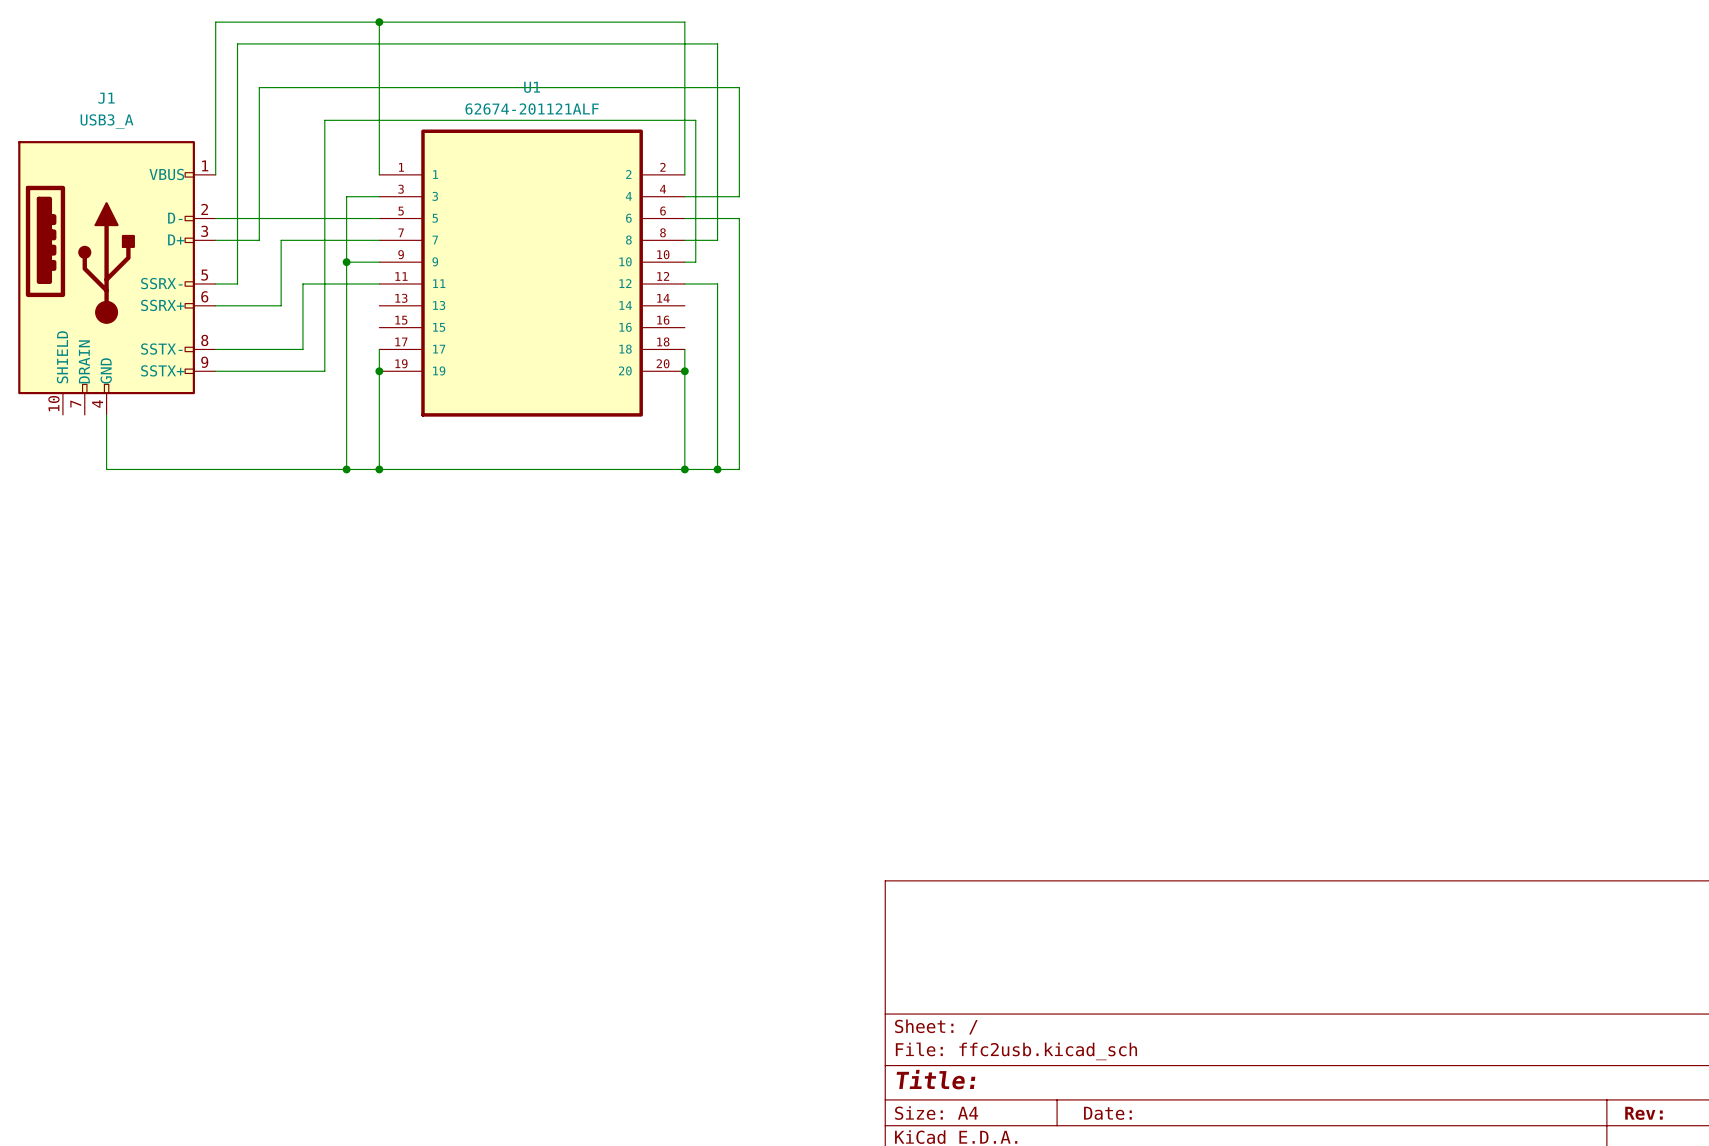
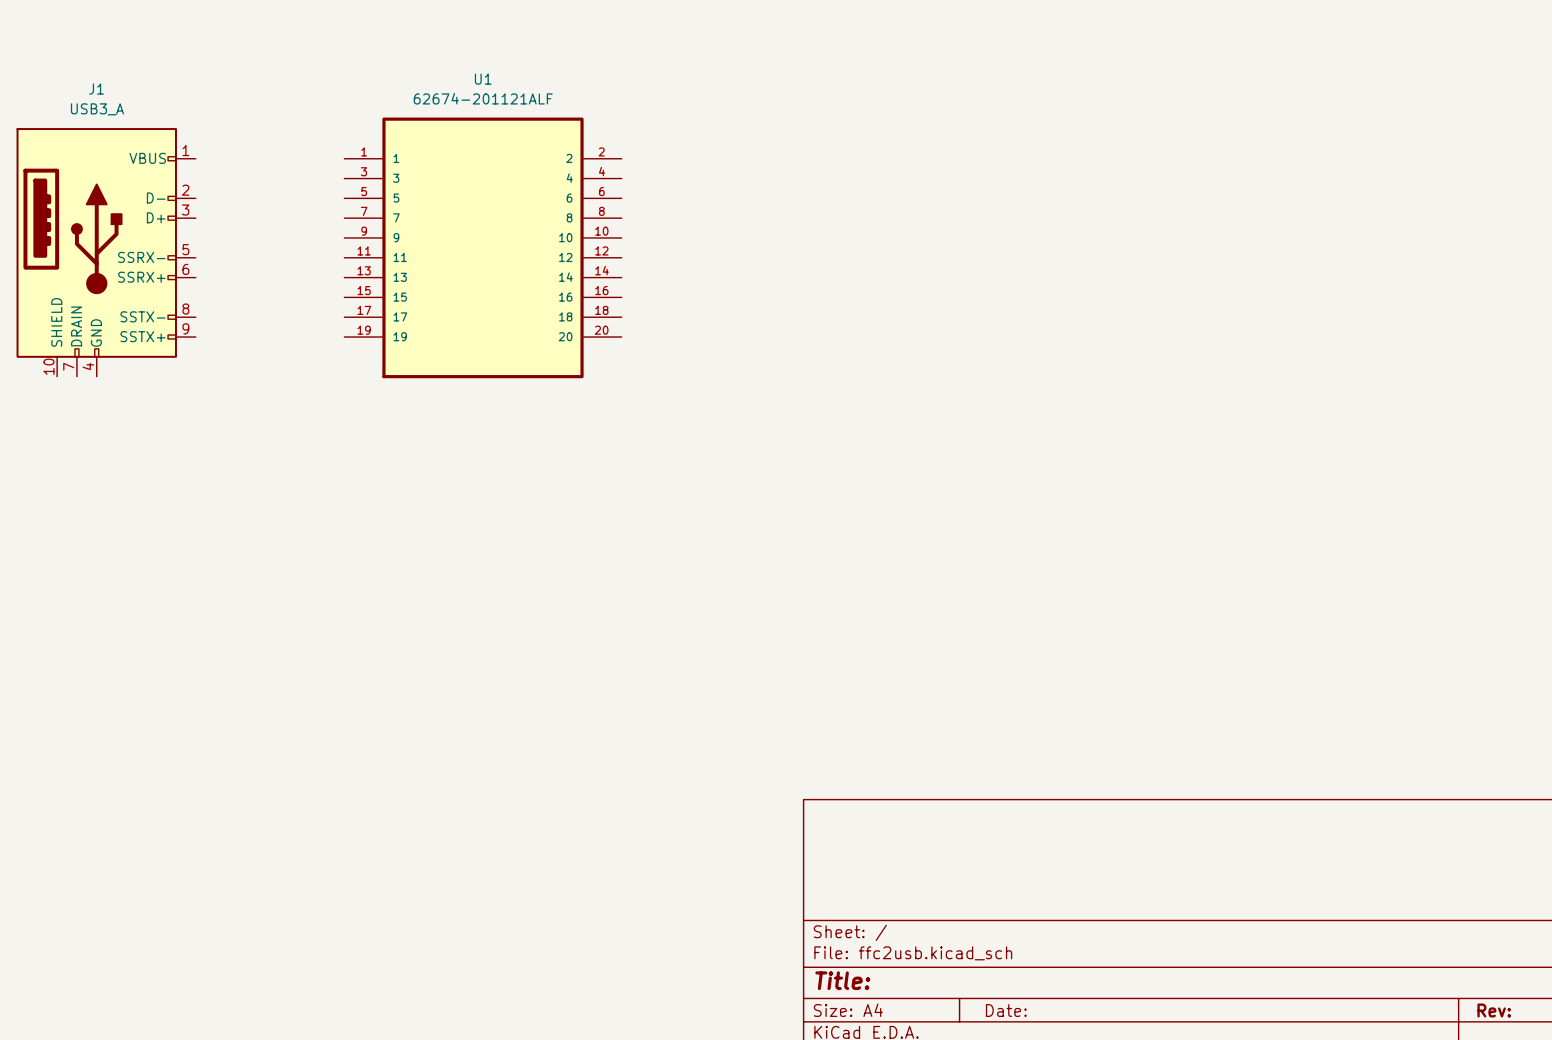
wire: (379, 22) (379, 174) -> none
junction: (379, 22) -> none
wire: (215, 174) (215, 22) (684, 22) (684, 174) -> none
wire: (379, 196) (346, 196) (346, 469) -> none
wire: (684, 196) (739, 196) (739, 87) (259, 87) (259, 240) (215, 240) -> none
wire: (215, 218) (379, 218) -> none
wire: (684, 218) (739, 218) (739, 469) (106, 469) (106, 414) -> none
wire: (379, 240) (281, 240) (281, 305) (215, 305) -> none
wire: (684, 240) (717, 240) (717, 43) (237, 43) (237, 283) (215, 283) -> none
wire: (346, 262) (379, 262) -> none
junction: (346, 262) -> none
wire: (684, 262) (695, 262) (695, 120) (324, 120) (324, 371) (215, 371) -> none
wire: (379, 283) (302, 283) (302, 349) (215, 349) -> none
wire: (684, 283) (717, 283) (717, 469) -> none
wire: (379, 349) (379, 469) -> none
wire: (684, 349) (684, 469) -> none
junction: (379, 371) -> none
junction: (684, 371) -> none
junction: (346, 469) -> none
junction: (379, 469) -> none
junction: (684, 469) -> none
junction: (717, 469) -> none

